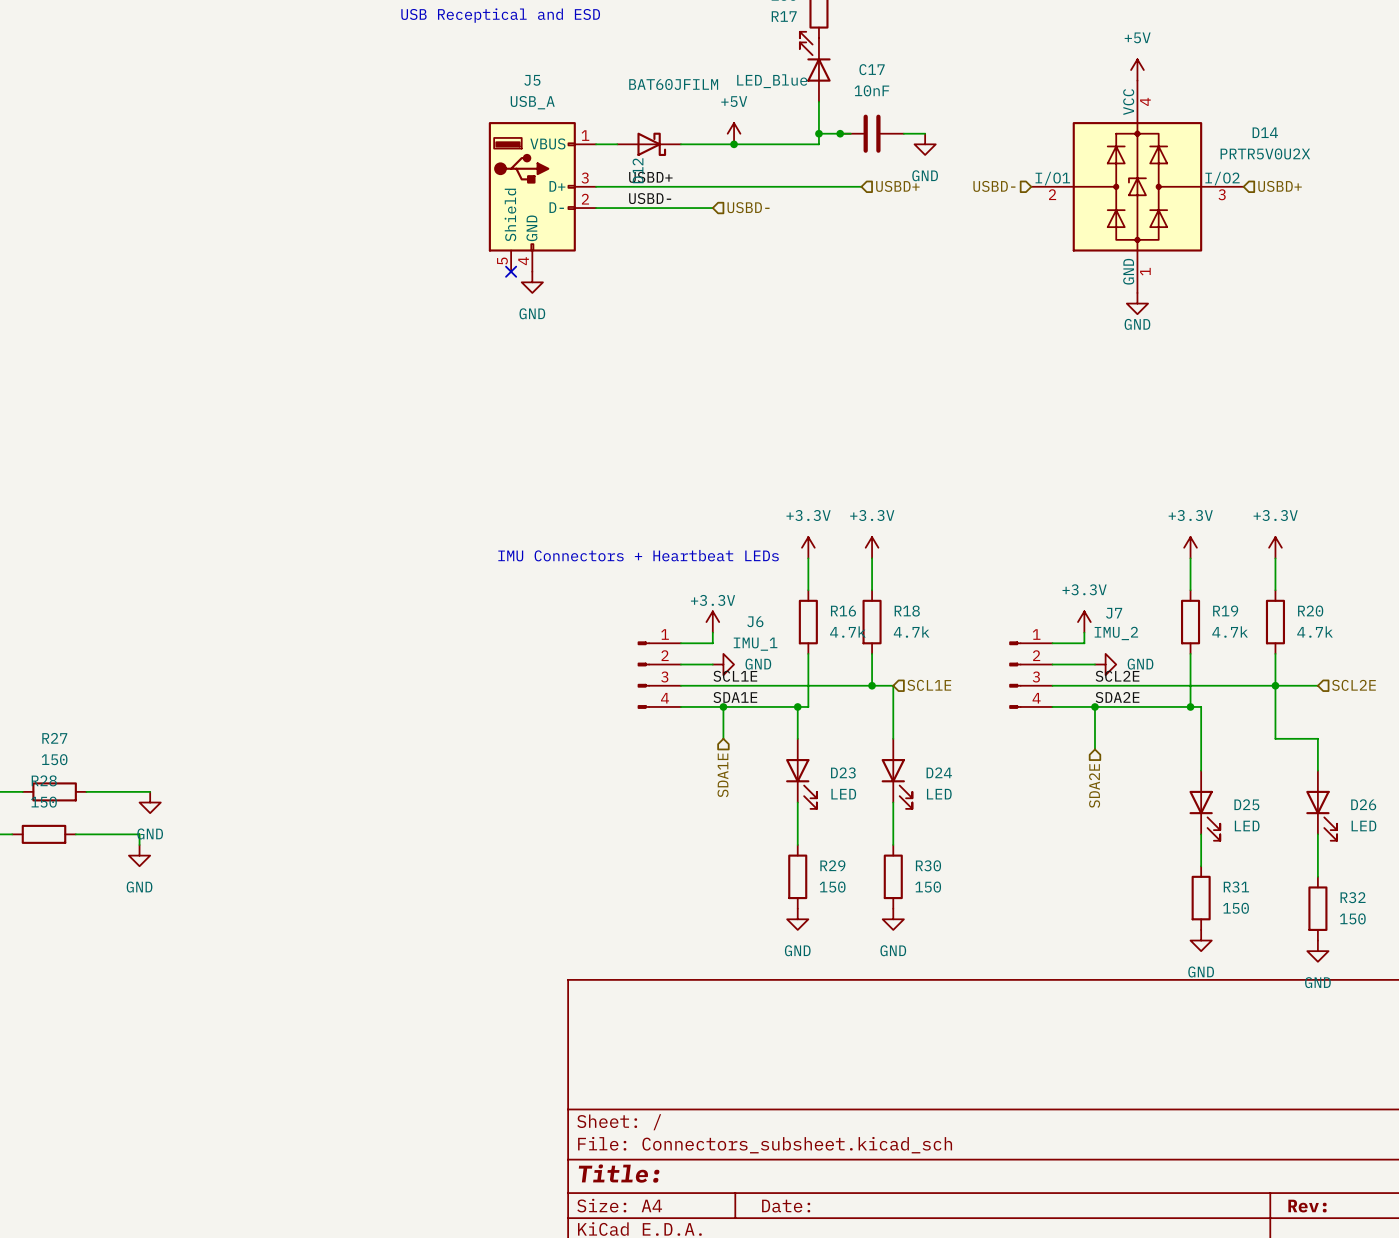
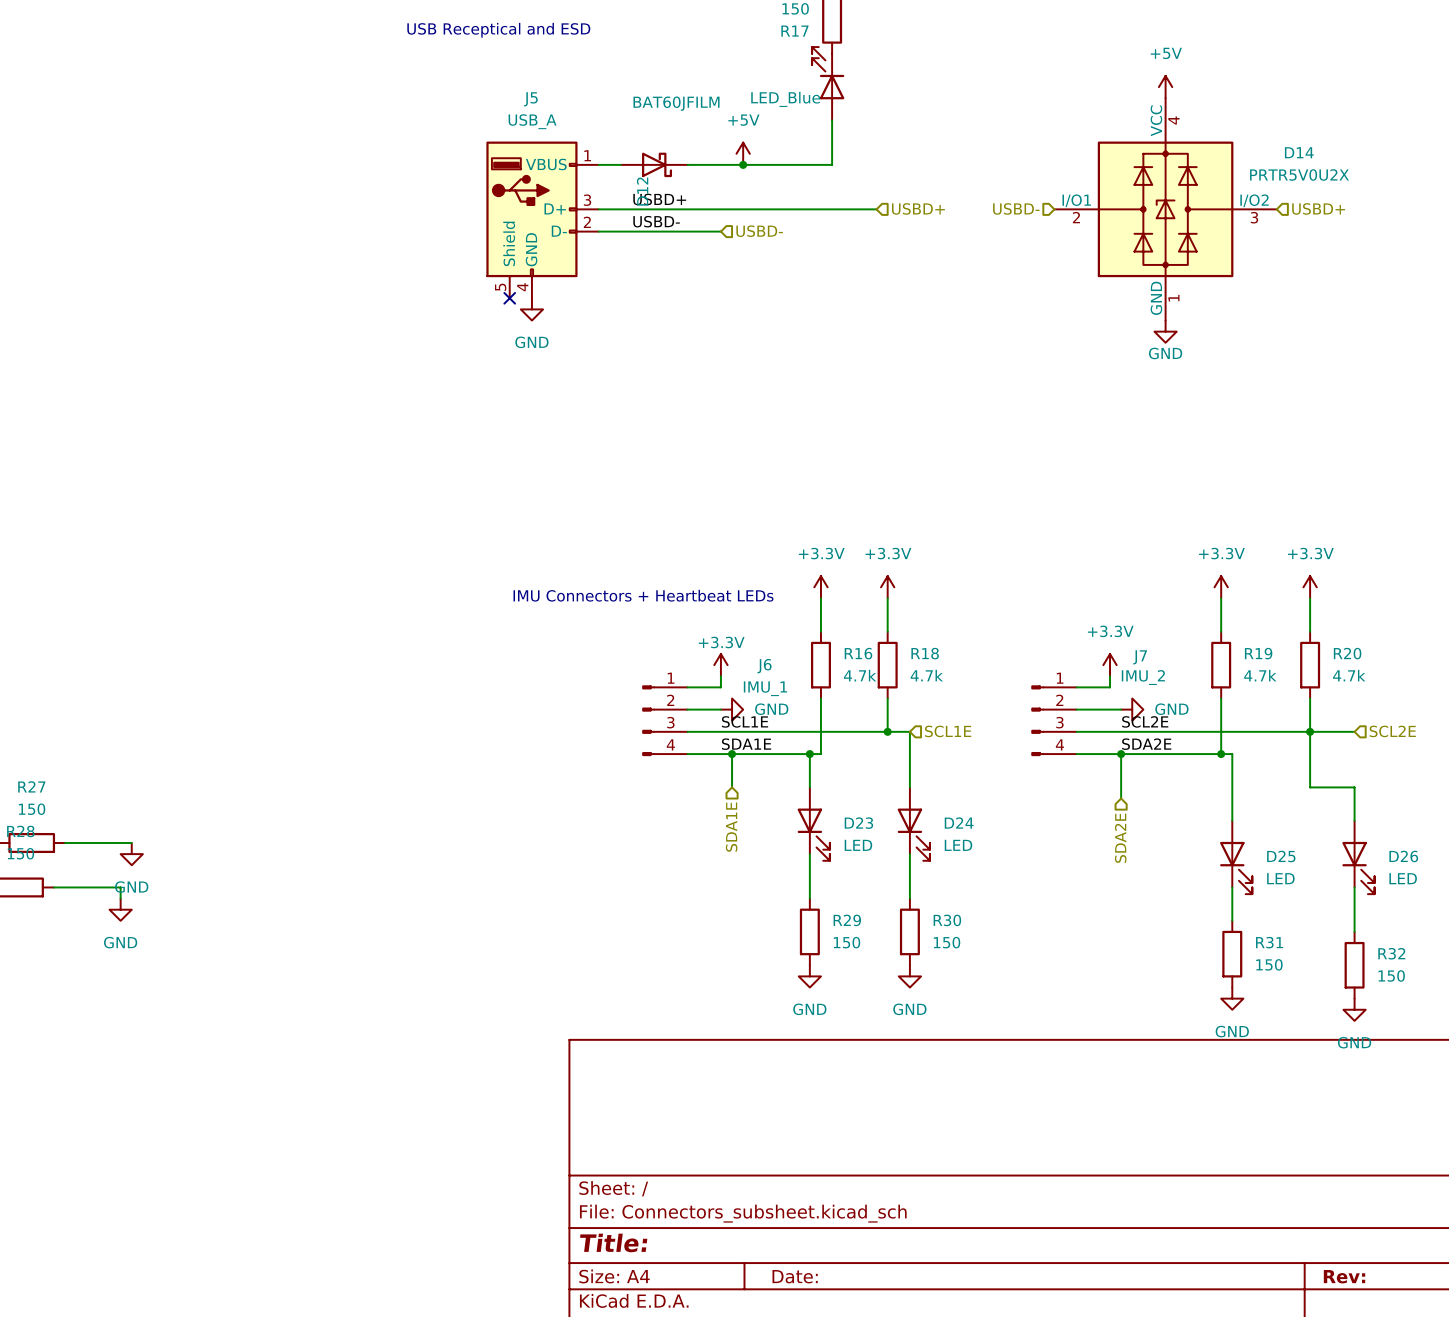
wire: (818, 133) (850, 133) -> none
junction: (818, 133) -> none
junction: (840, 133) -> none
C17: 10nF (872, 133) -> none
wire: (903, 133) (925, 133) -> none
power symbol: GND (925, 144) -> none

